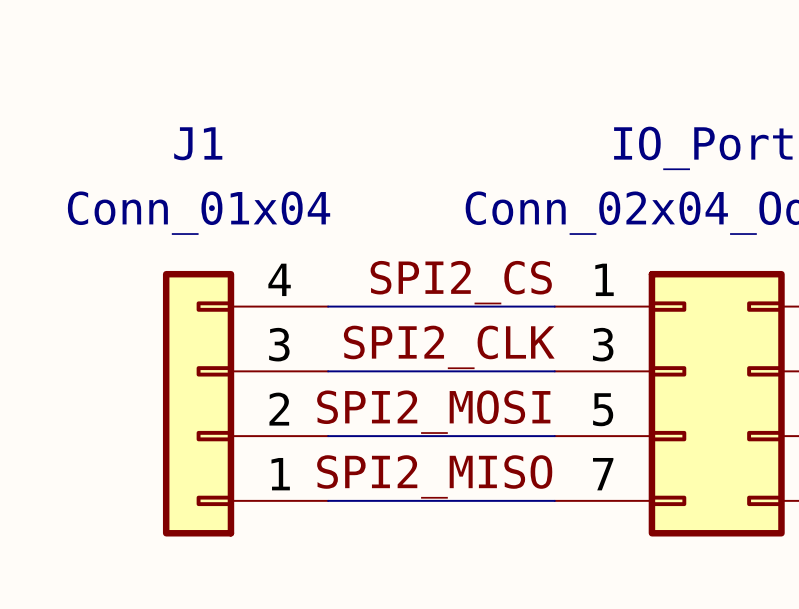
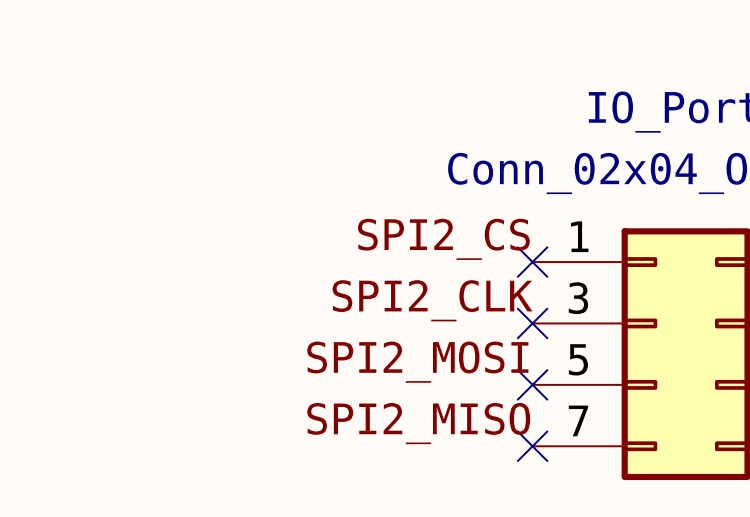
wire: (328, 306) (554, 306) -> none
no-connect mark: none -> (532, 262)
wire: (328, 371) (554, 371) -> none
no-connect mark: none -> (532, 323)
J1: Conn_01x04 (245, 403) -> none
wire: (328, 436) (554, 436) -> none
no-connect mark: none -> (532, 384)
wire: (328, 500) (554, 500) -> none
no-connect mark: none -> (532, 446)

